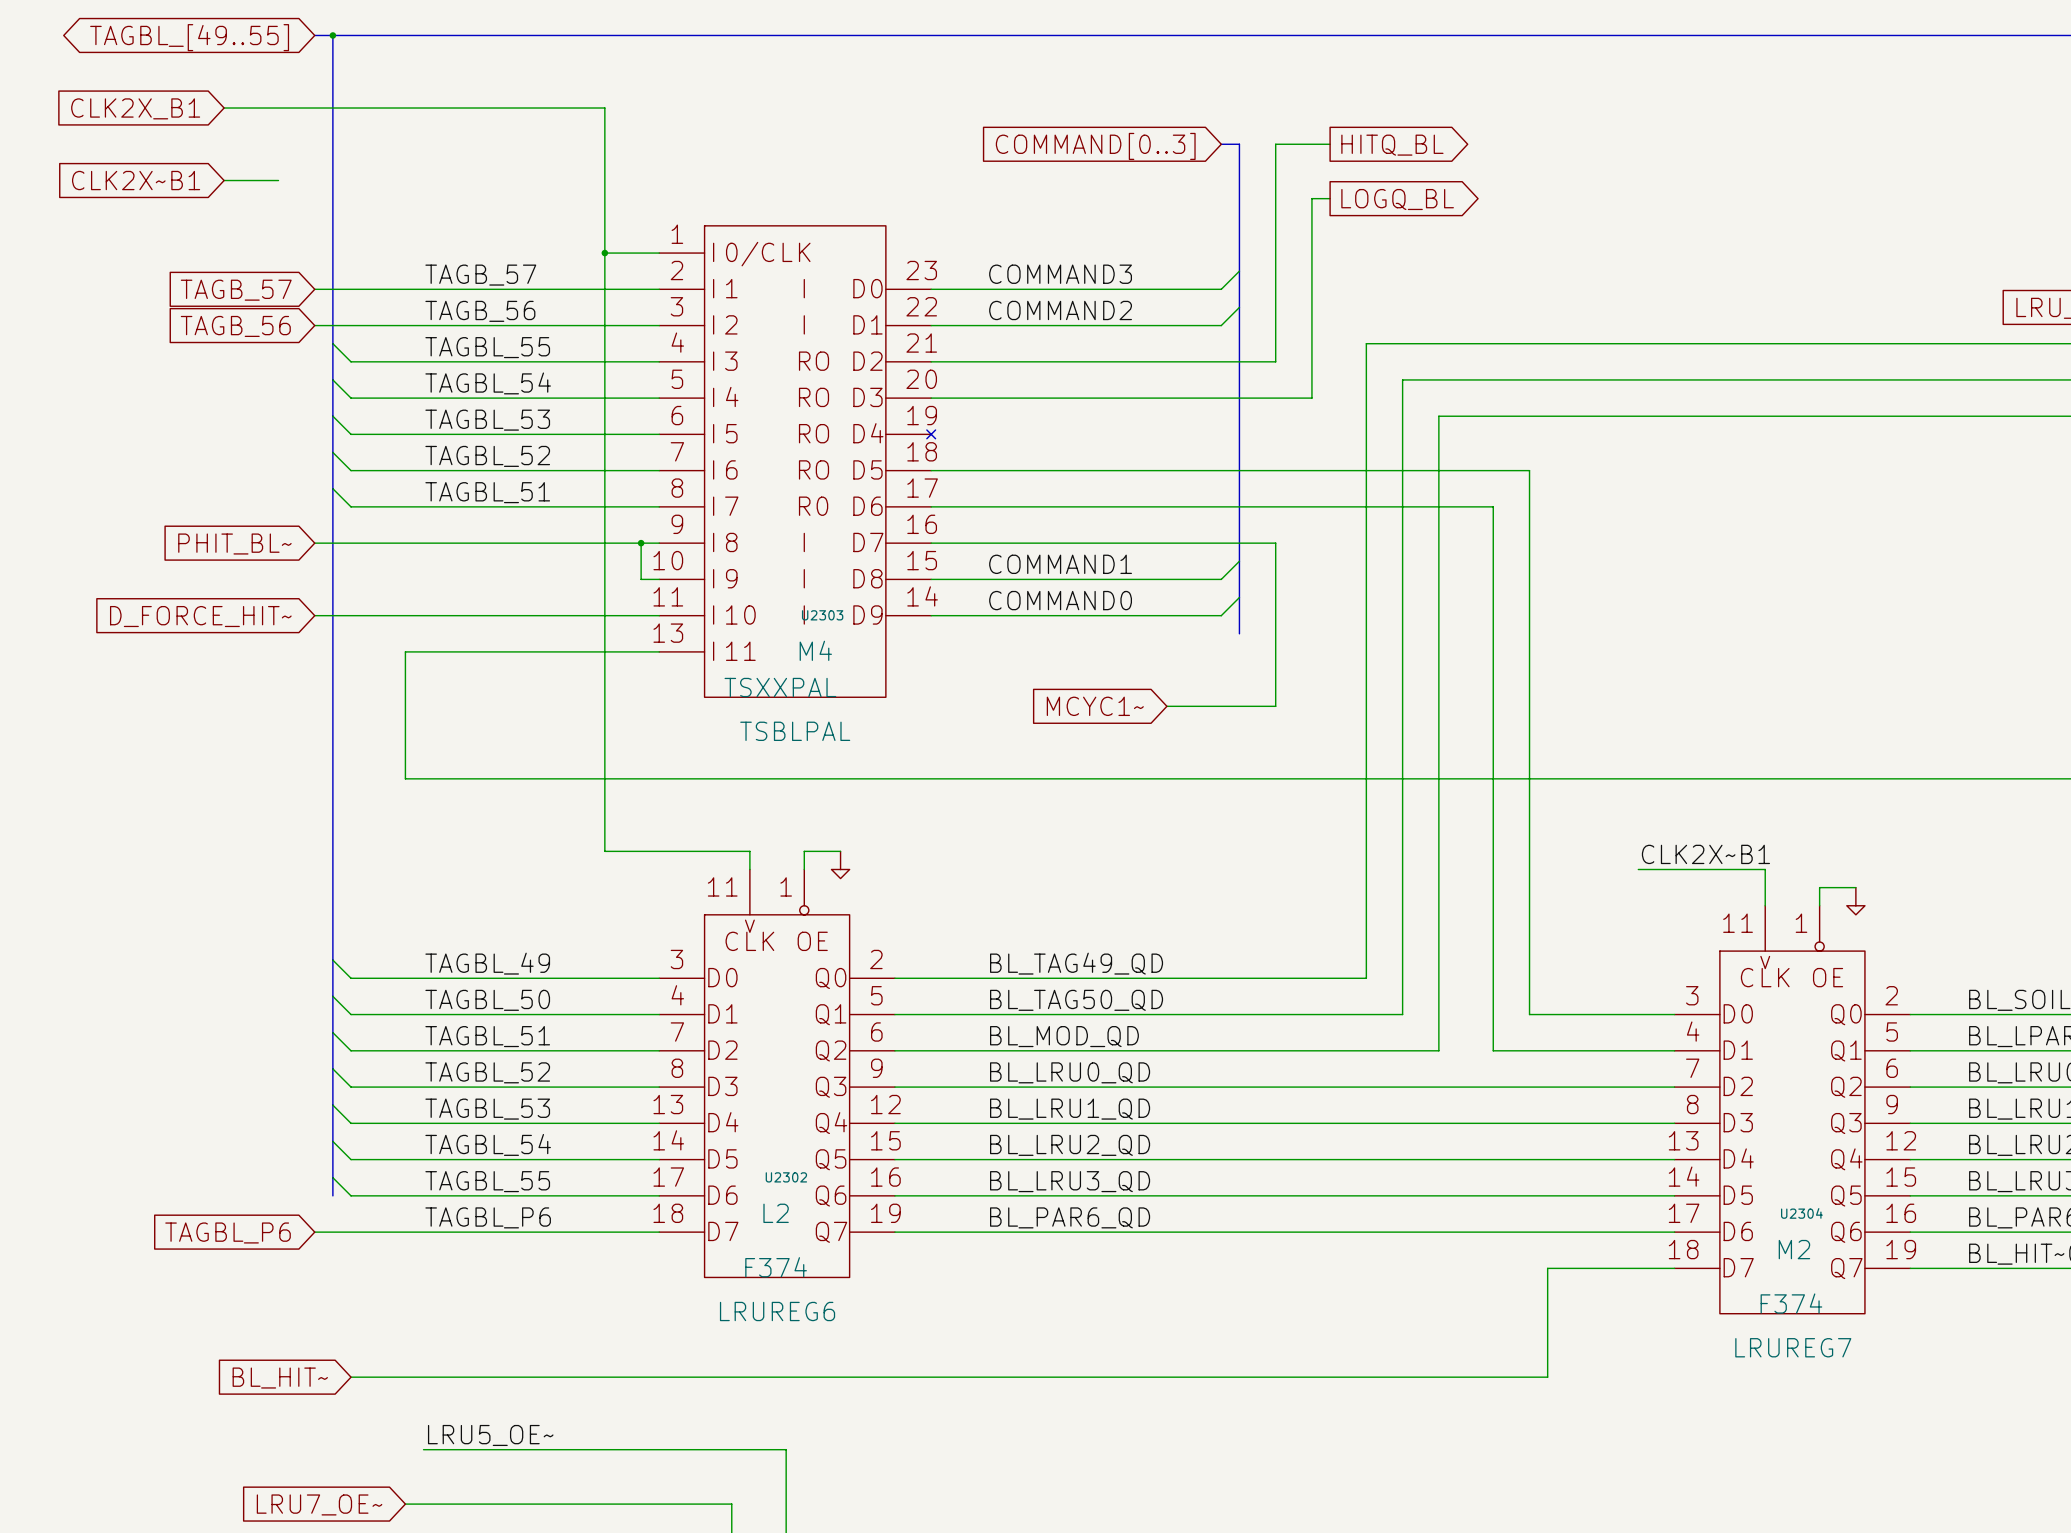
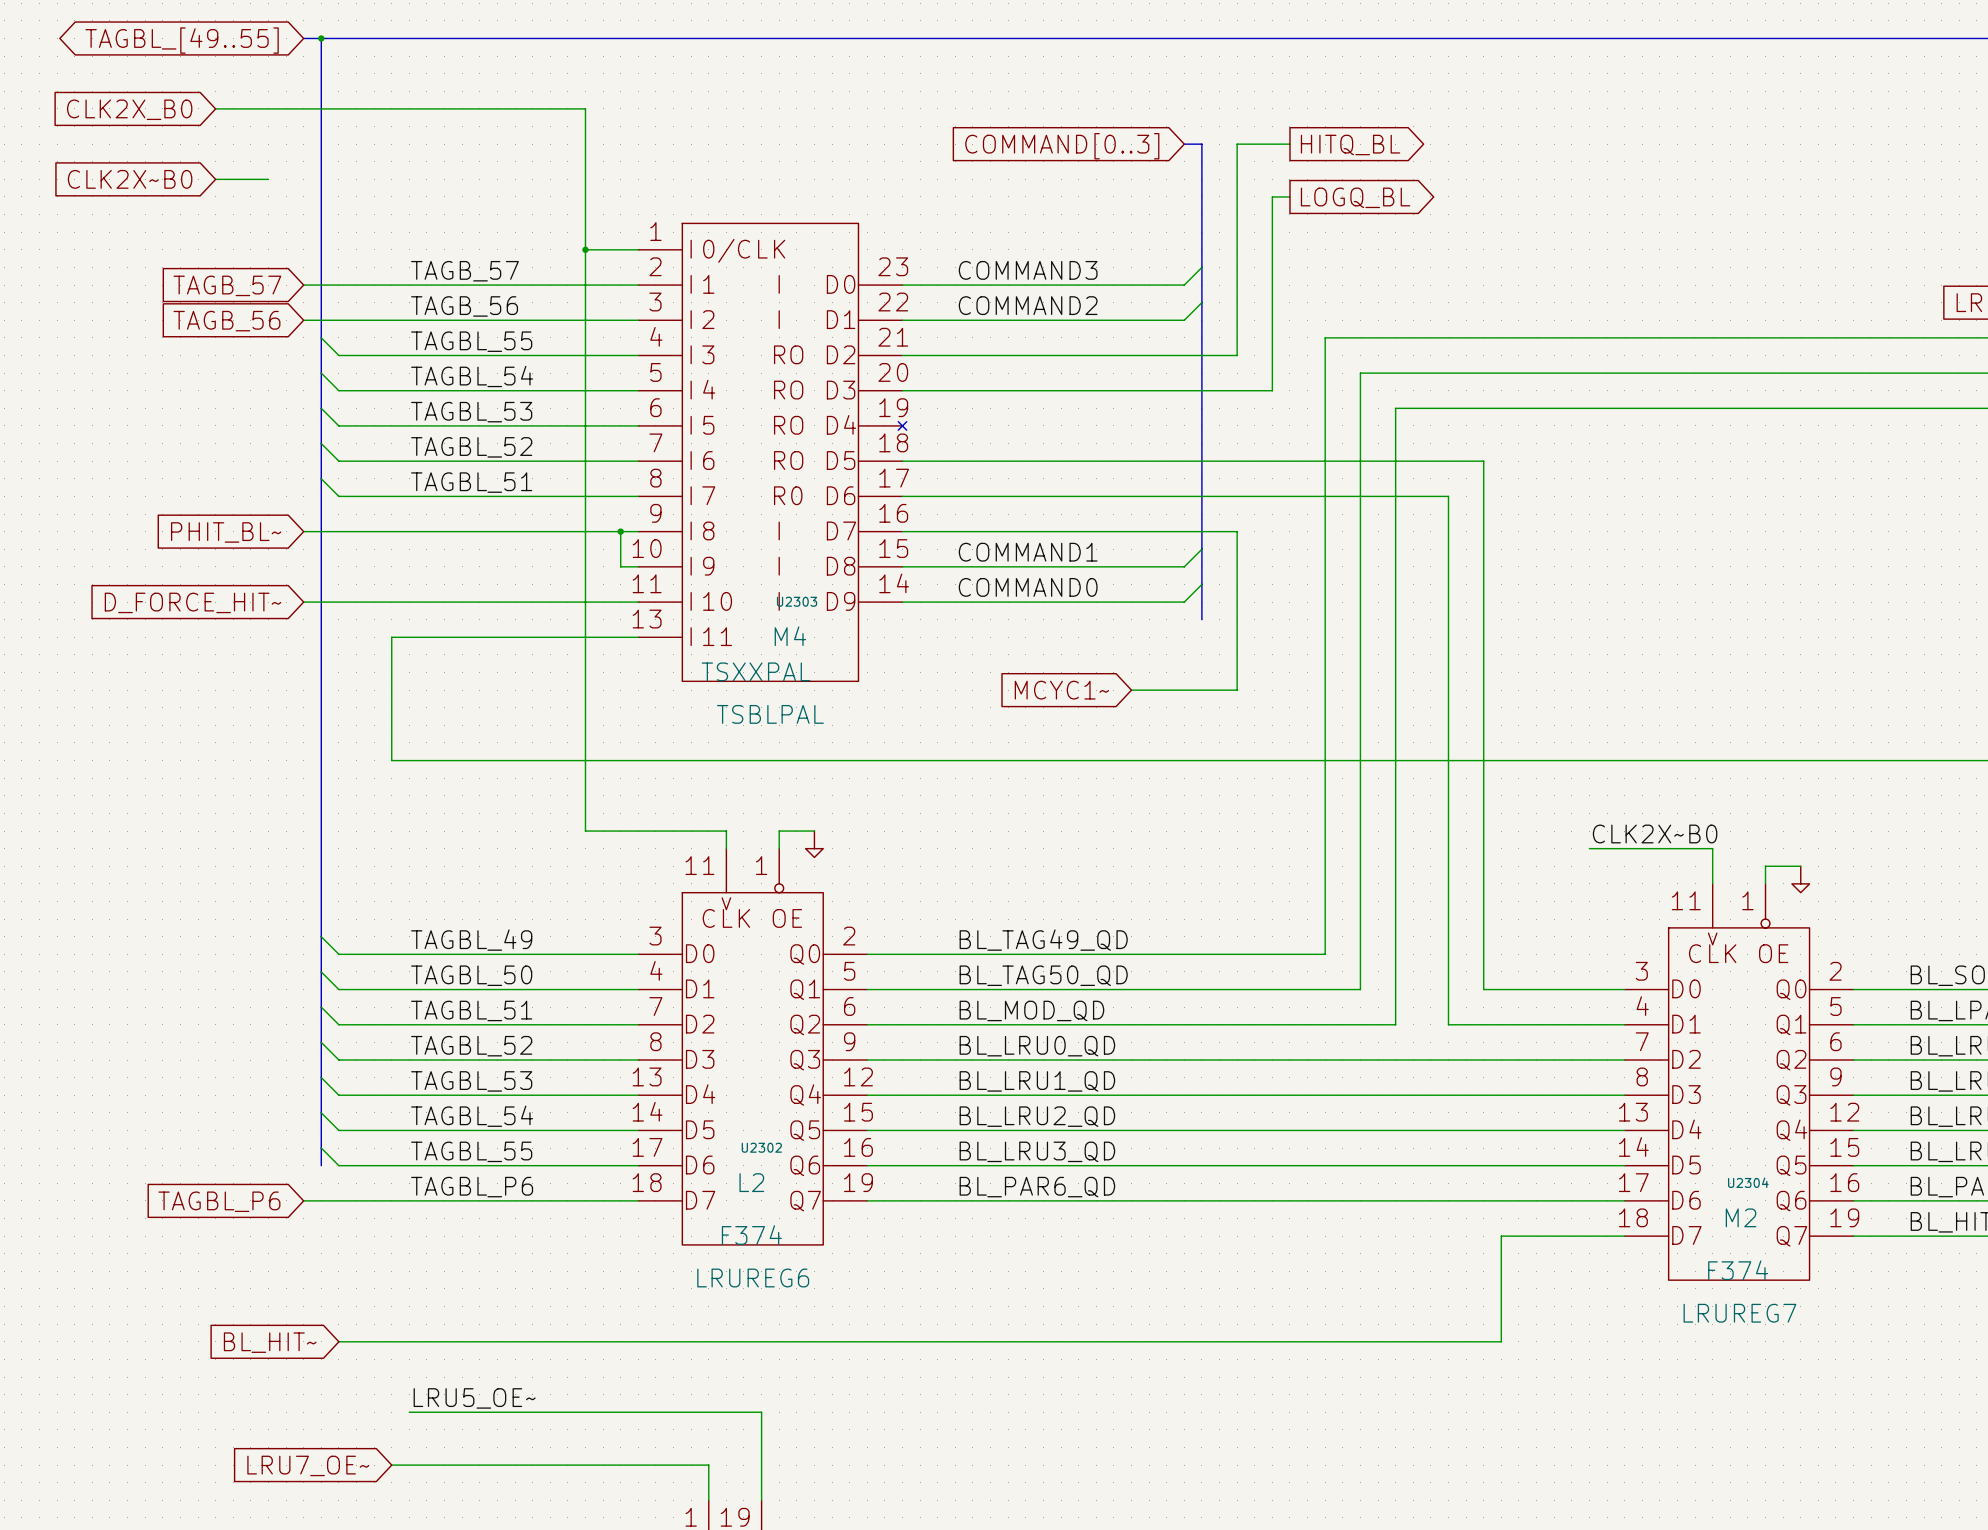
global label: CLK2X_B1 (135, 108) -> CLK2X_B0 (129, 109)
global label: CLK2X~B1 (136, 180) -> CLK2X~B0 (130, 179)
label: CLK2X~B1 (1705, 854) -> CLK2X~B0 (1655, 833)

